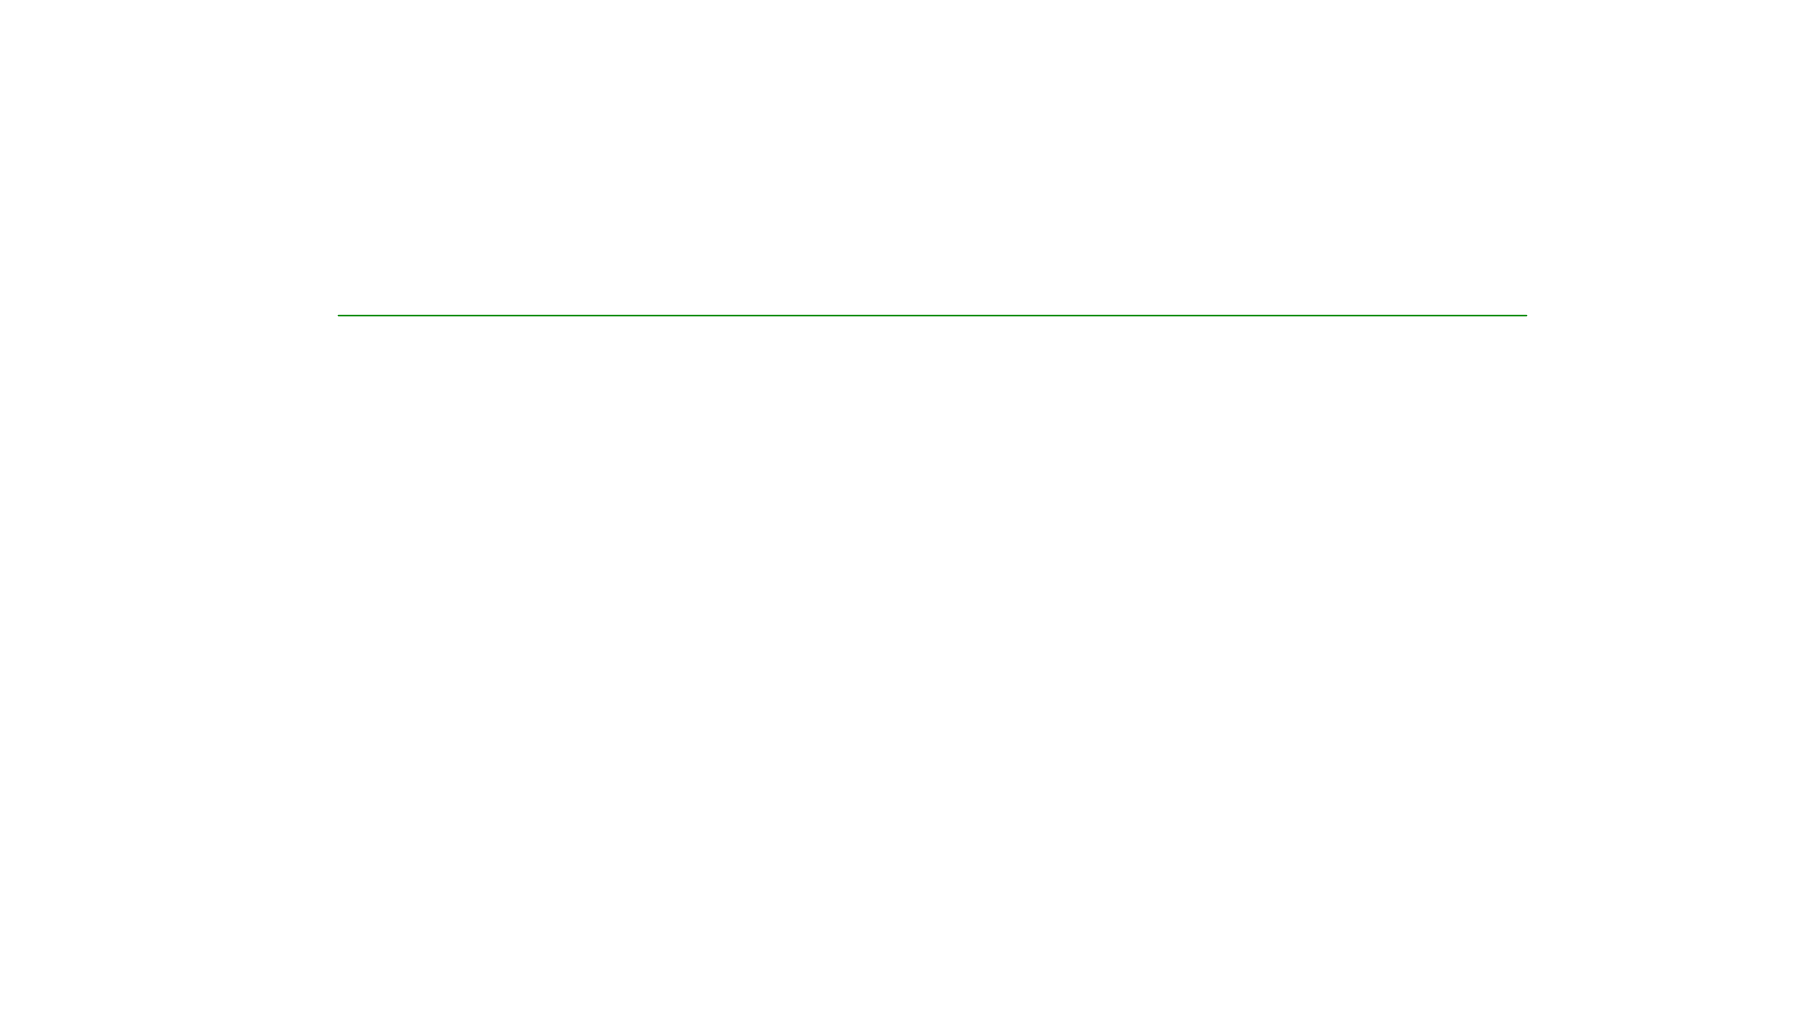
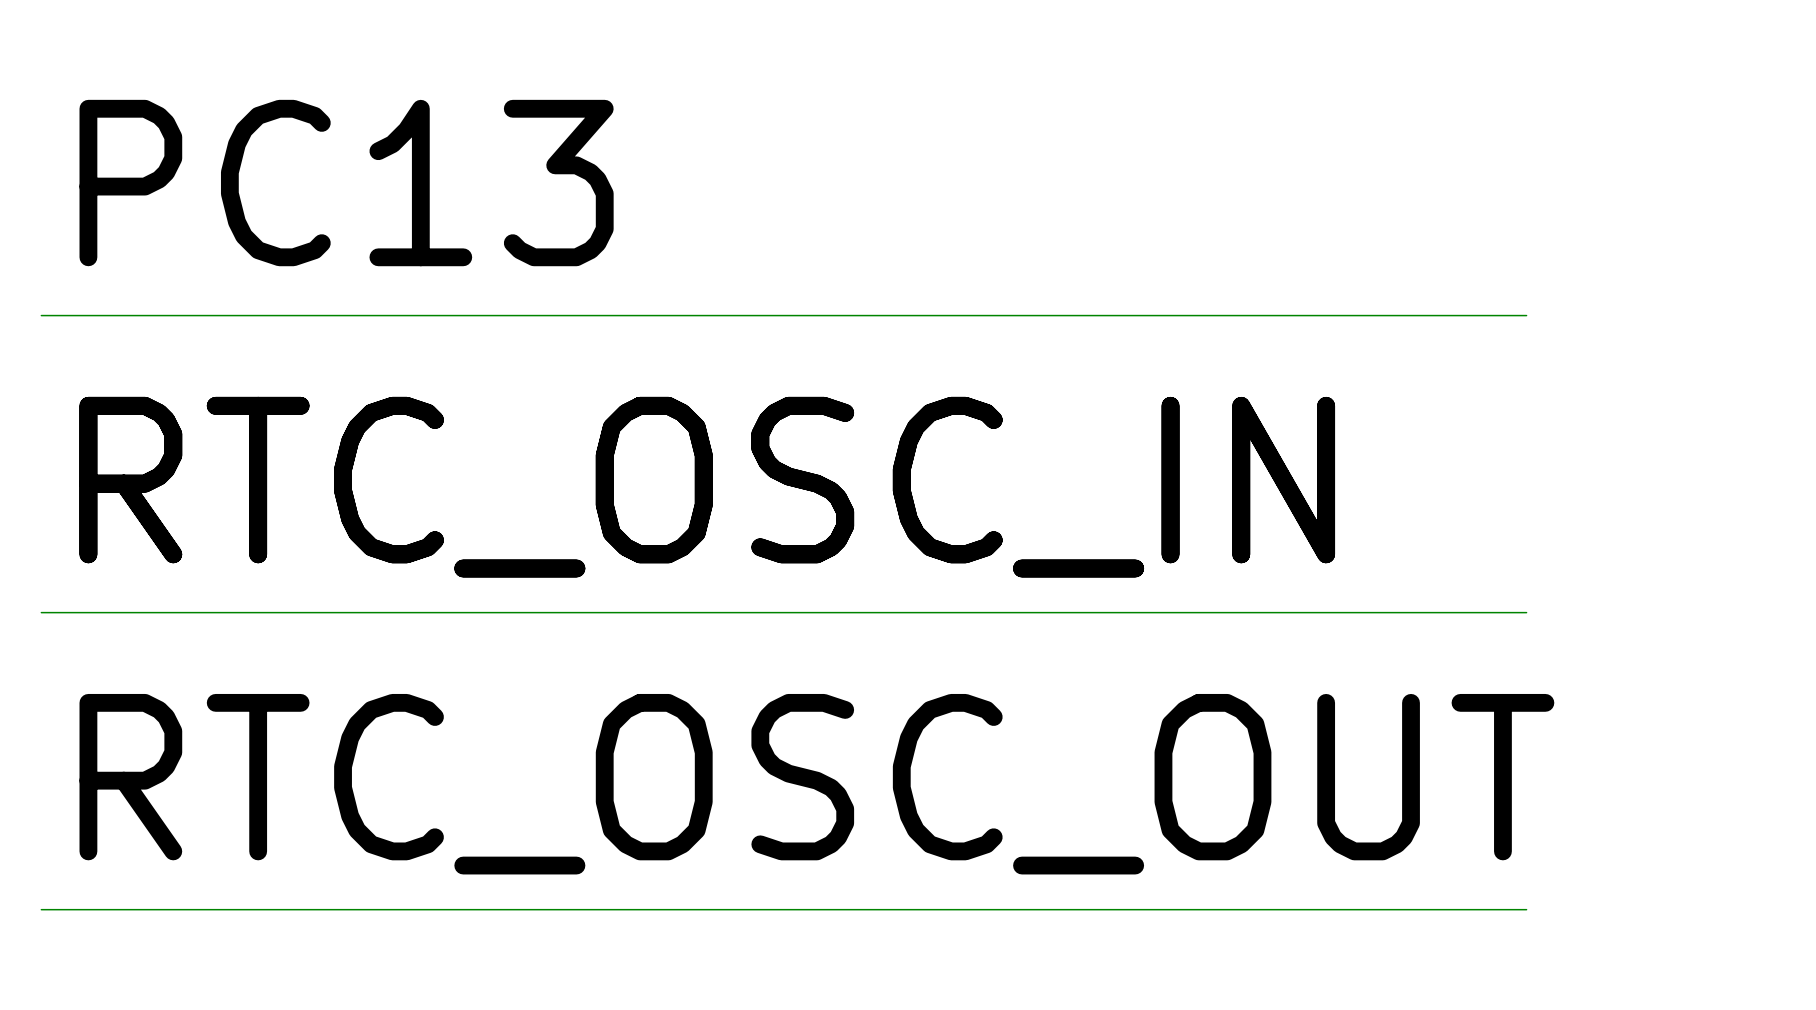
label: none -> PC13 (346, 183)
wire: none -> (41, 315) (338, 315)
label: none -> RTC_OSC_IN (707, 487)
wire: none -> (41, 612) (1526, 612)
label: none -> RTC_OSC_OUT (816, 784)
wire: none -> (41, 909) (1526, 909)

